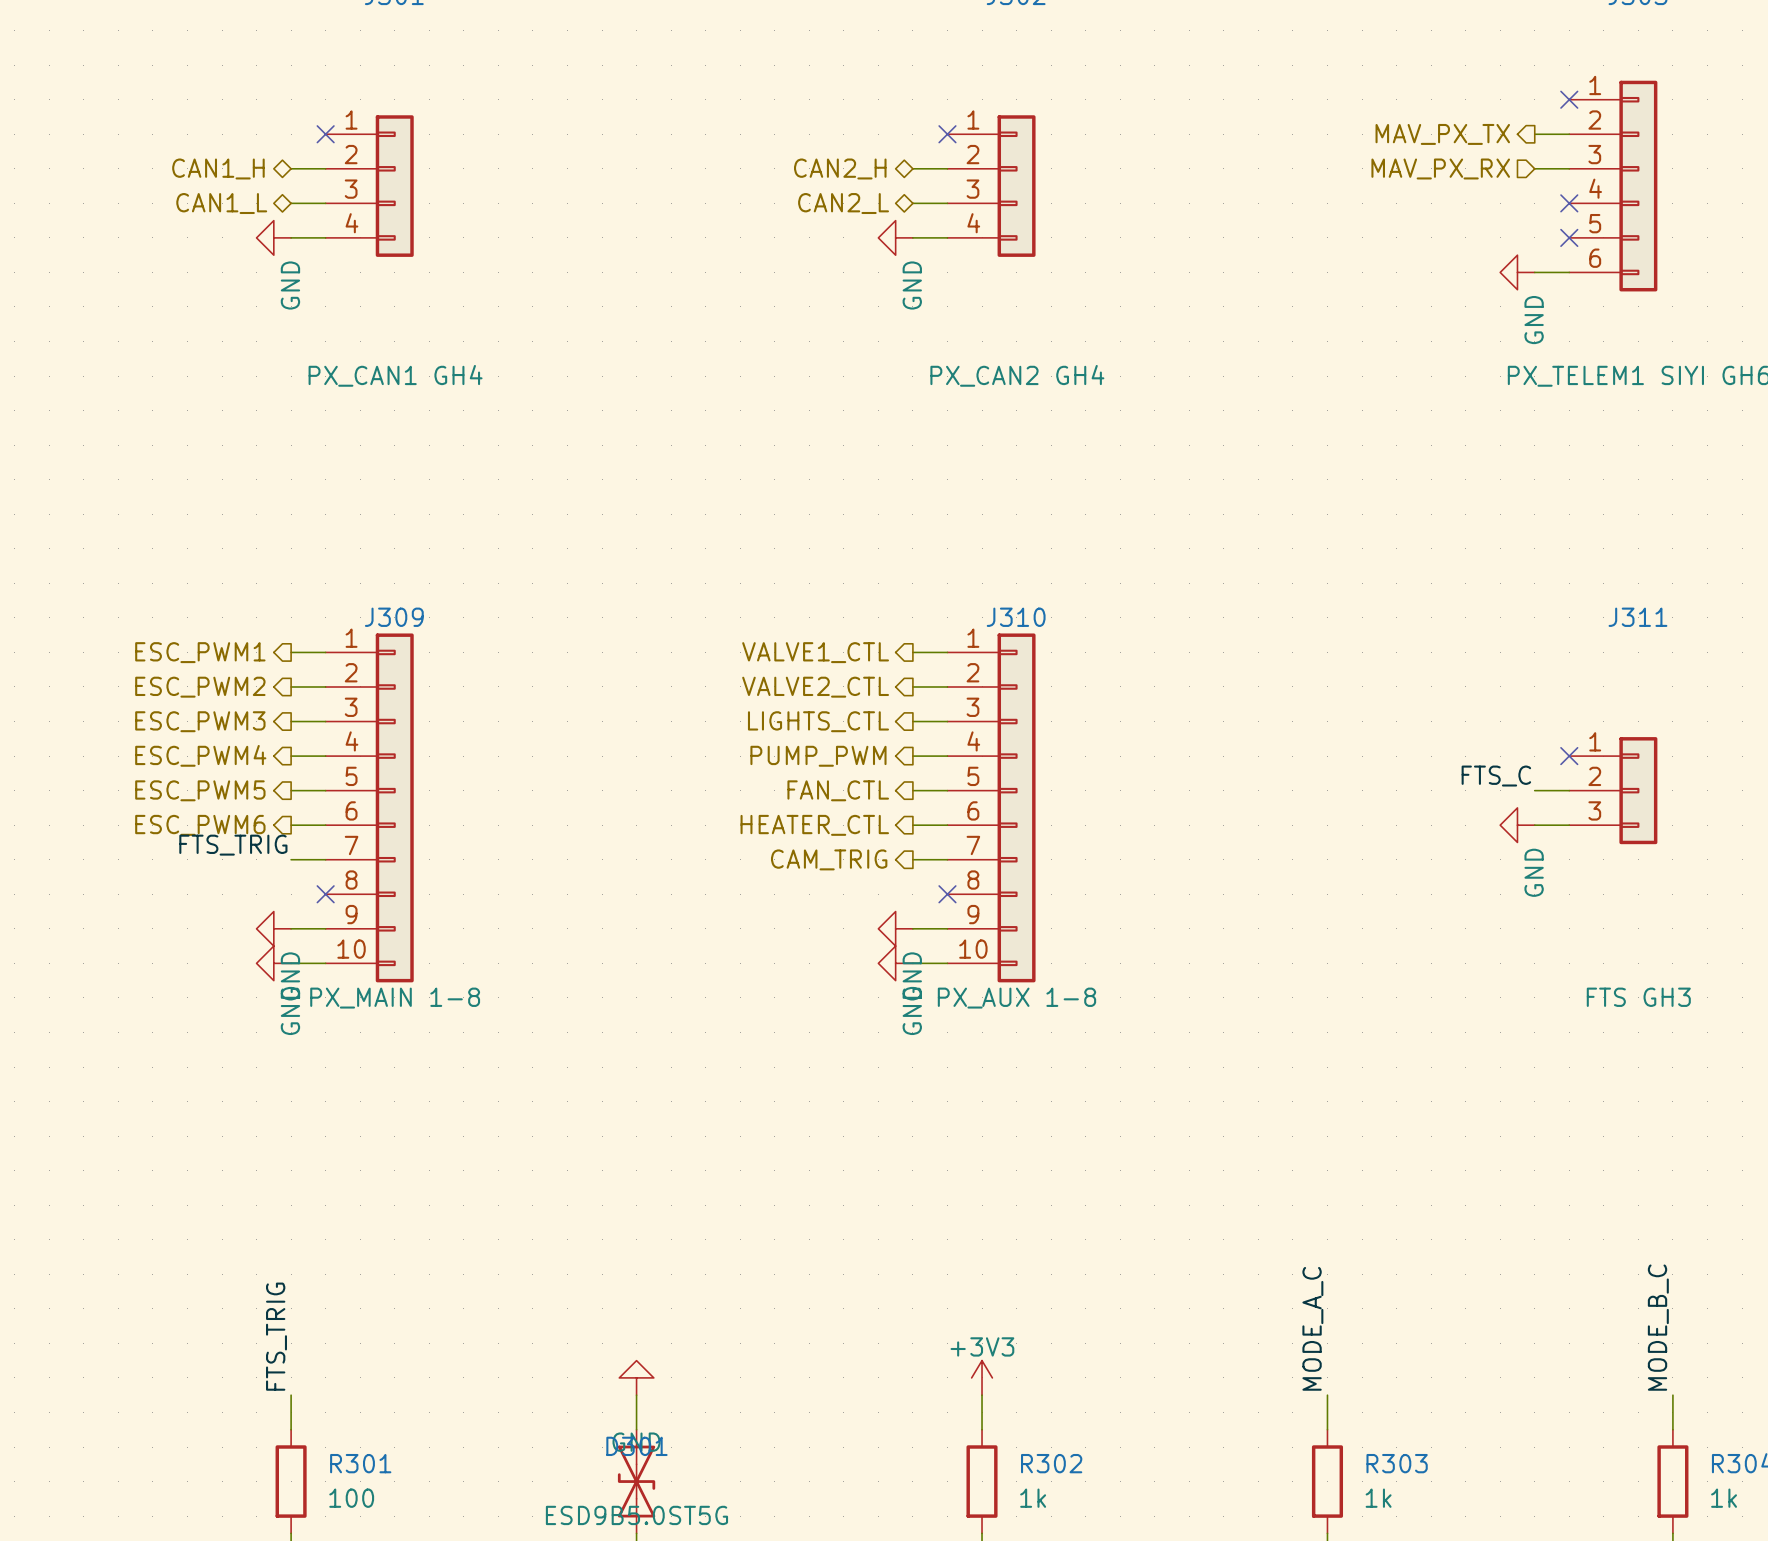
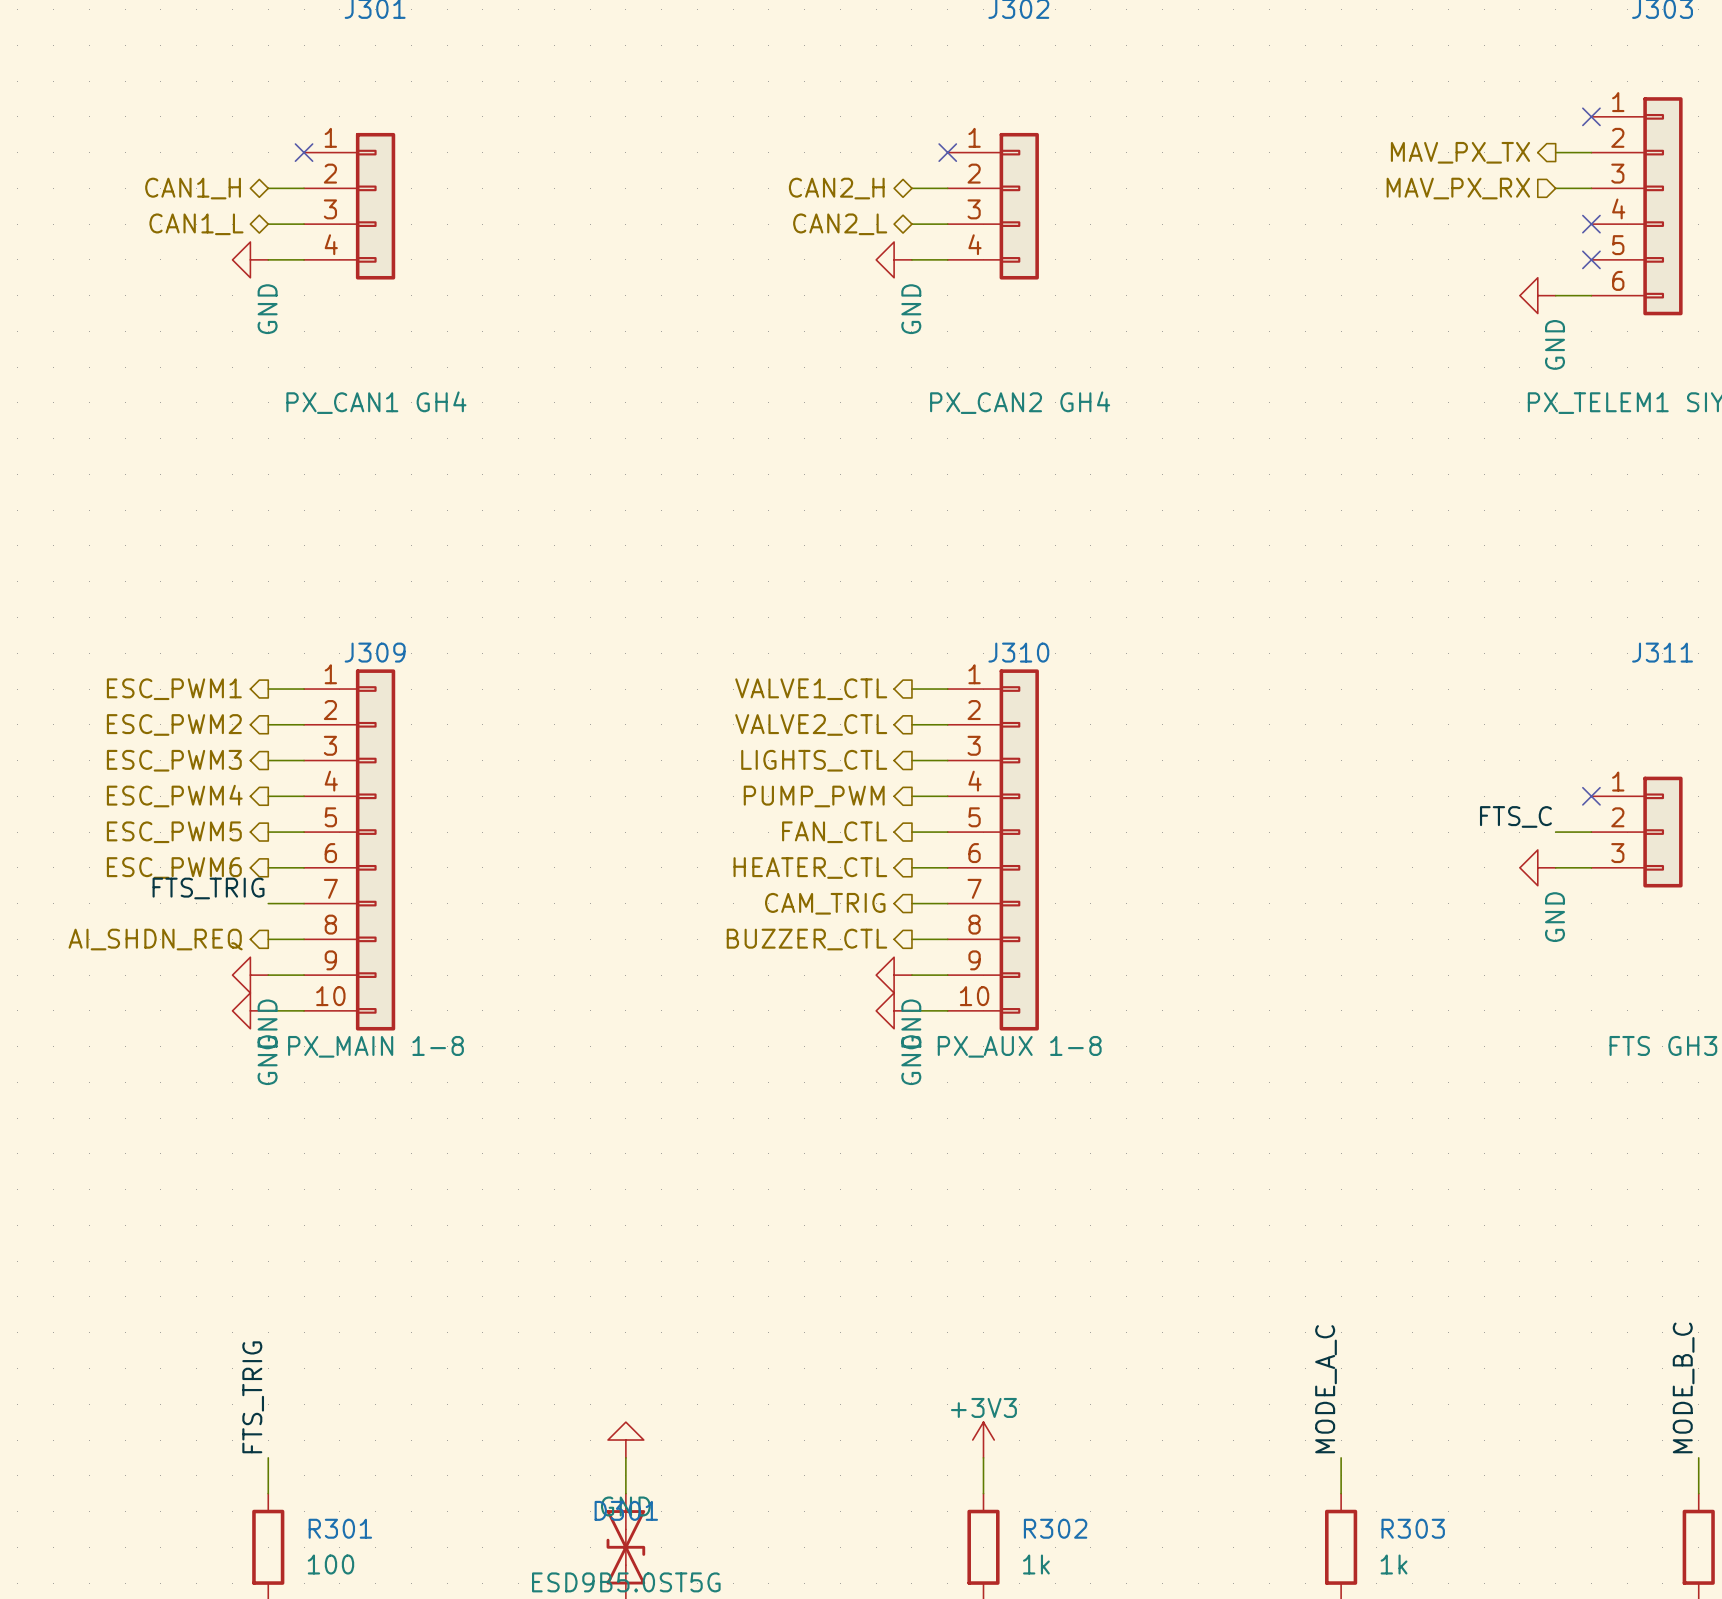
hierarchical label: none -> AI_SHDN_REQ (155, 939)
wire: none -> (268, 939) (304, 939)
no-connect mark: (325, 894) -> none
hierarchical label: none -> BUZZER_CTL (806, 939)
wire: none -> (911, 939) (947, 939)
no-connect mark: (947, 894) -> none

